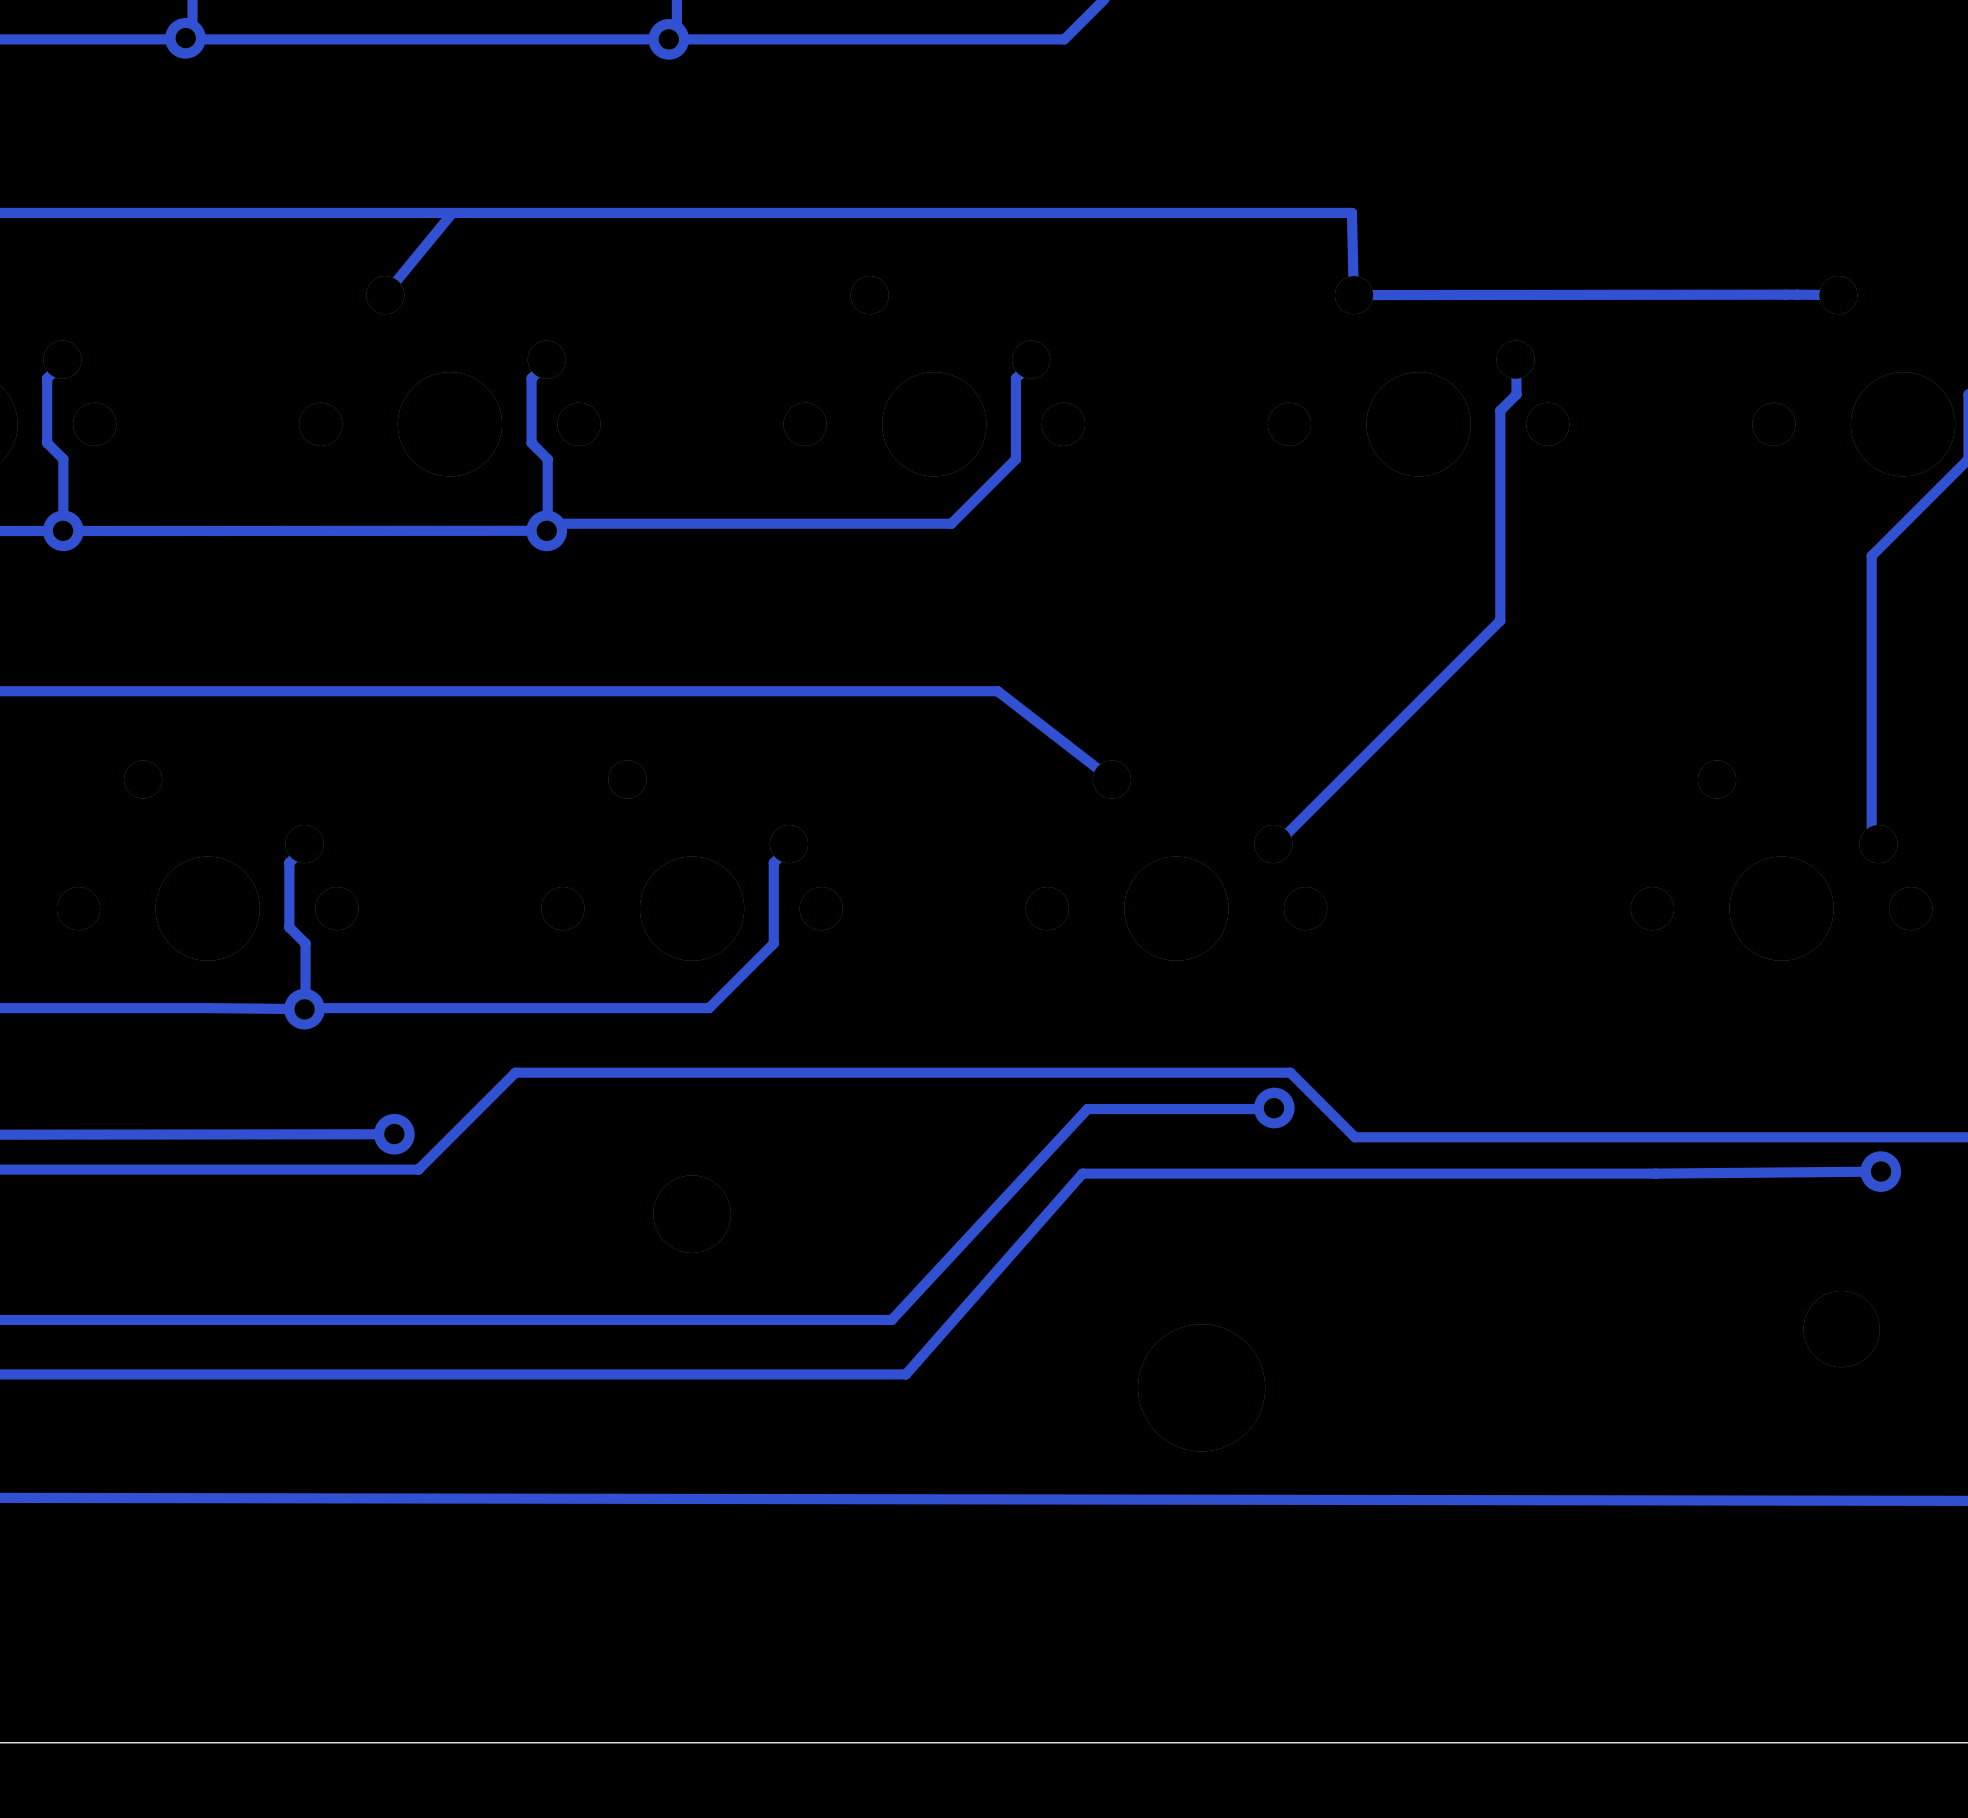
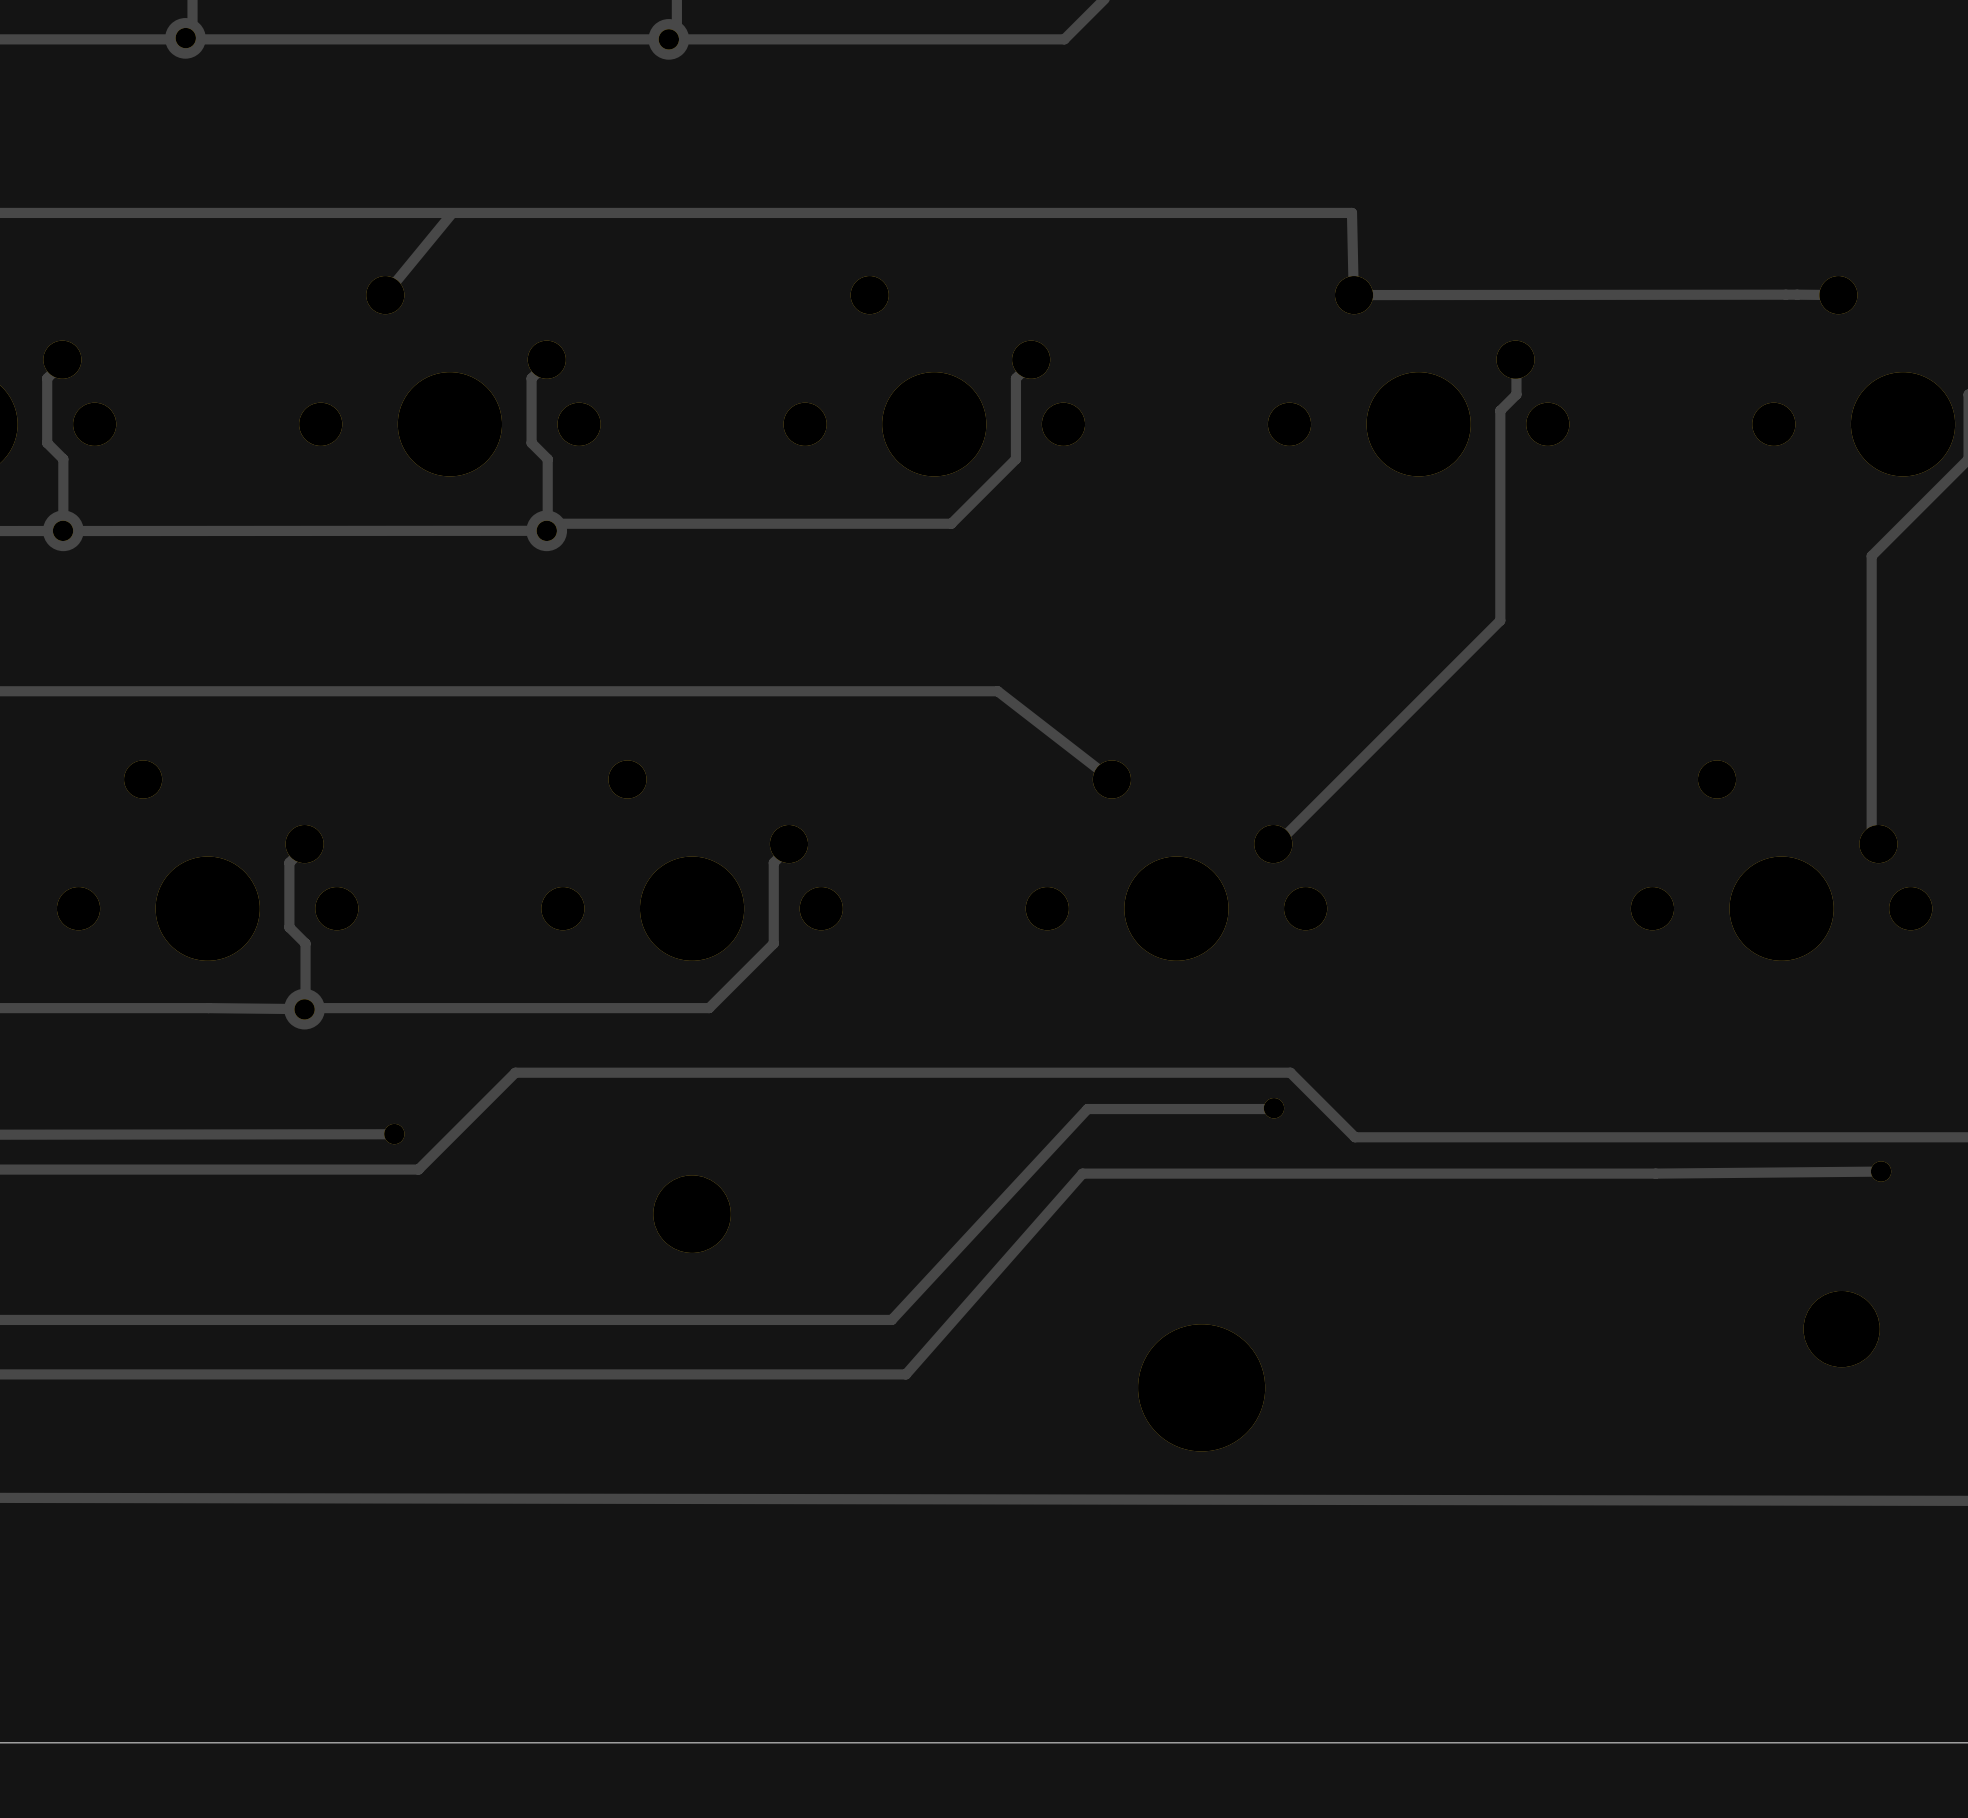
drawing: [1253, 1087, 1295, 1129] -> none
drawing: [373, 1113, 415, 1155] -> none
drawing: [1860, 1151, 1902, 1192] -> none

